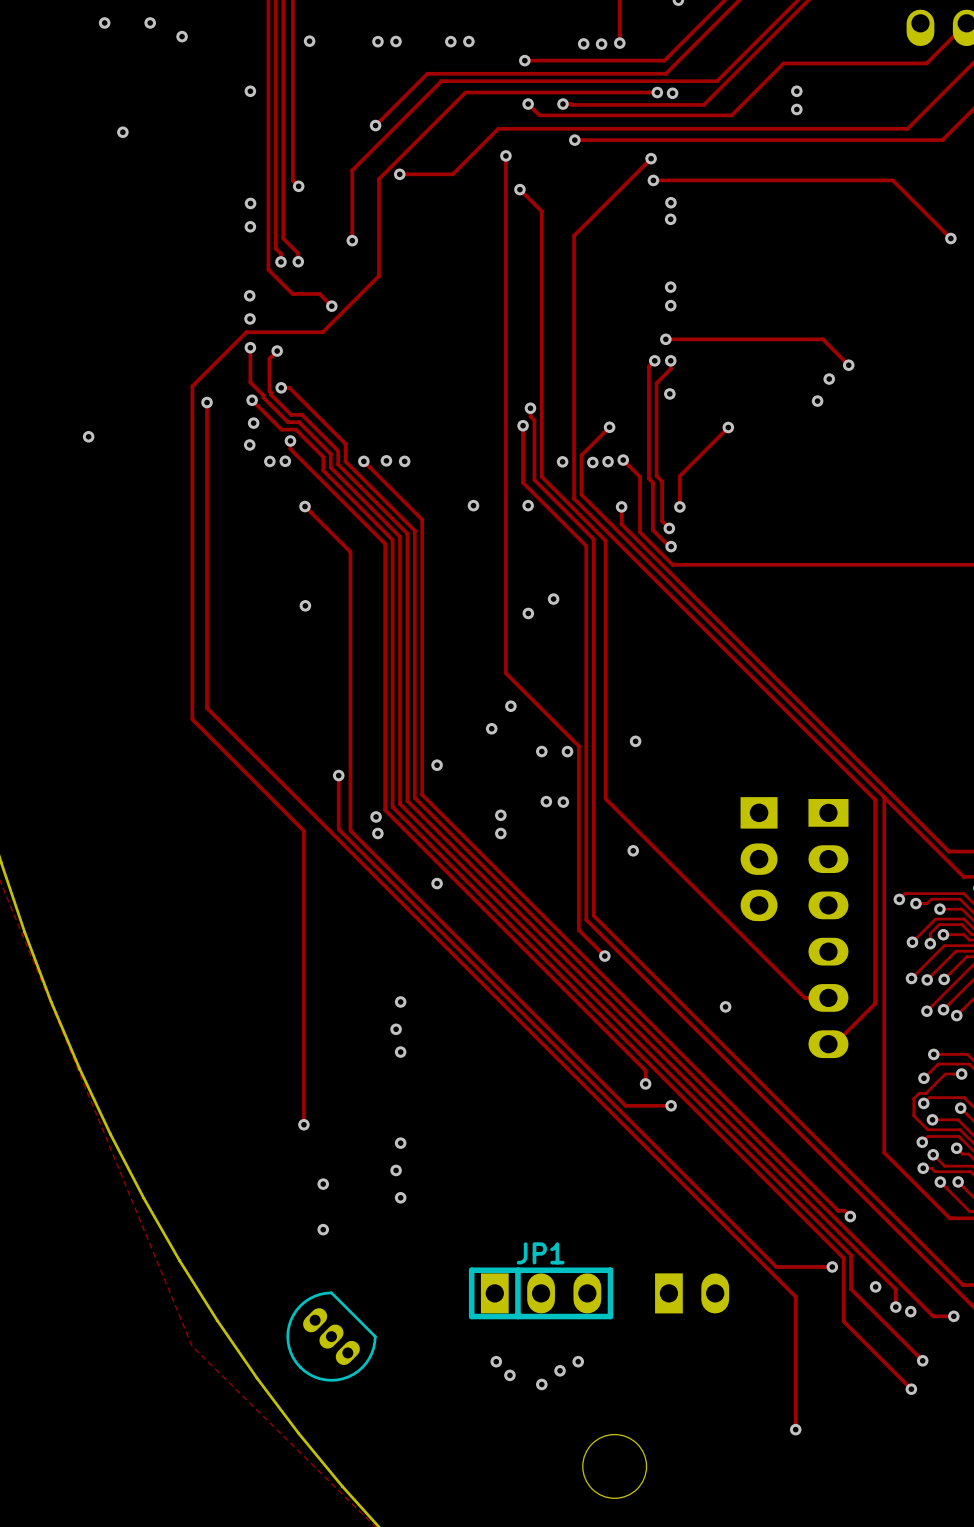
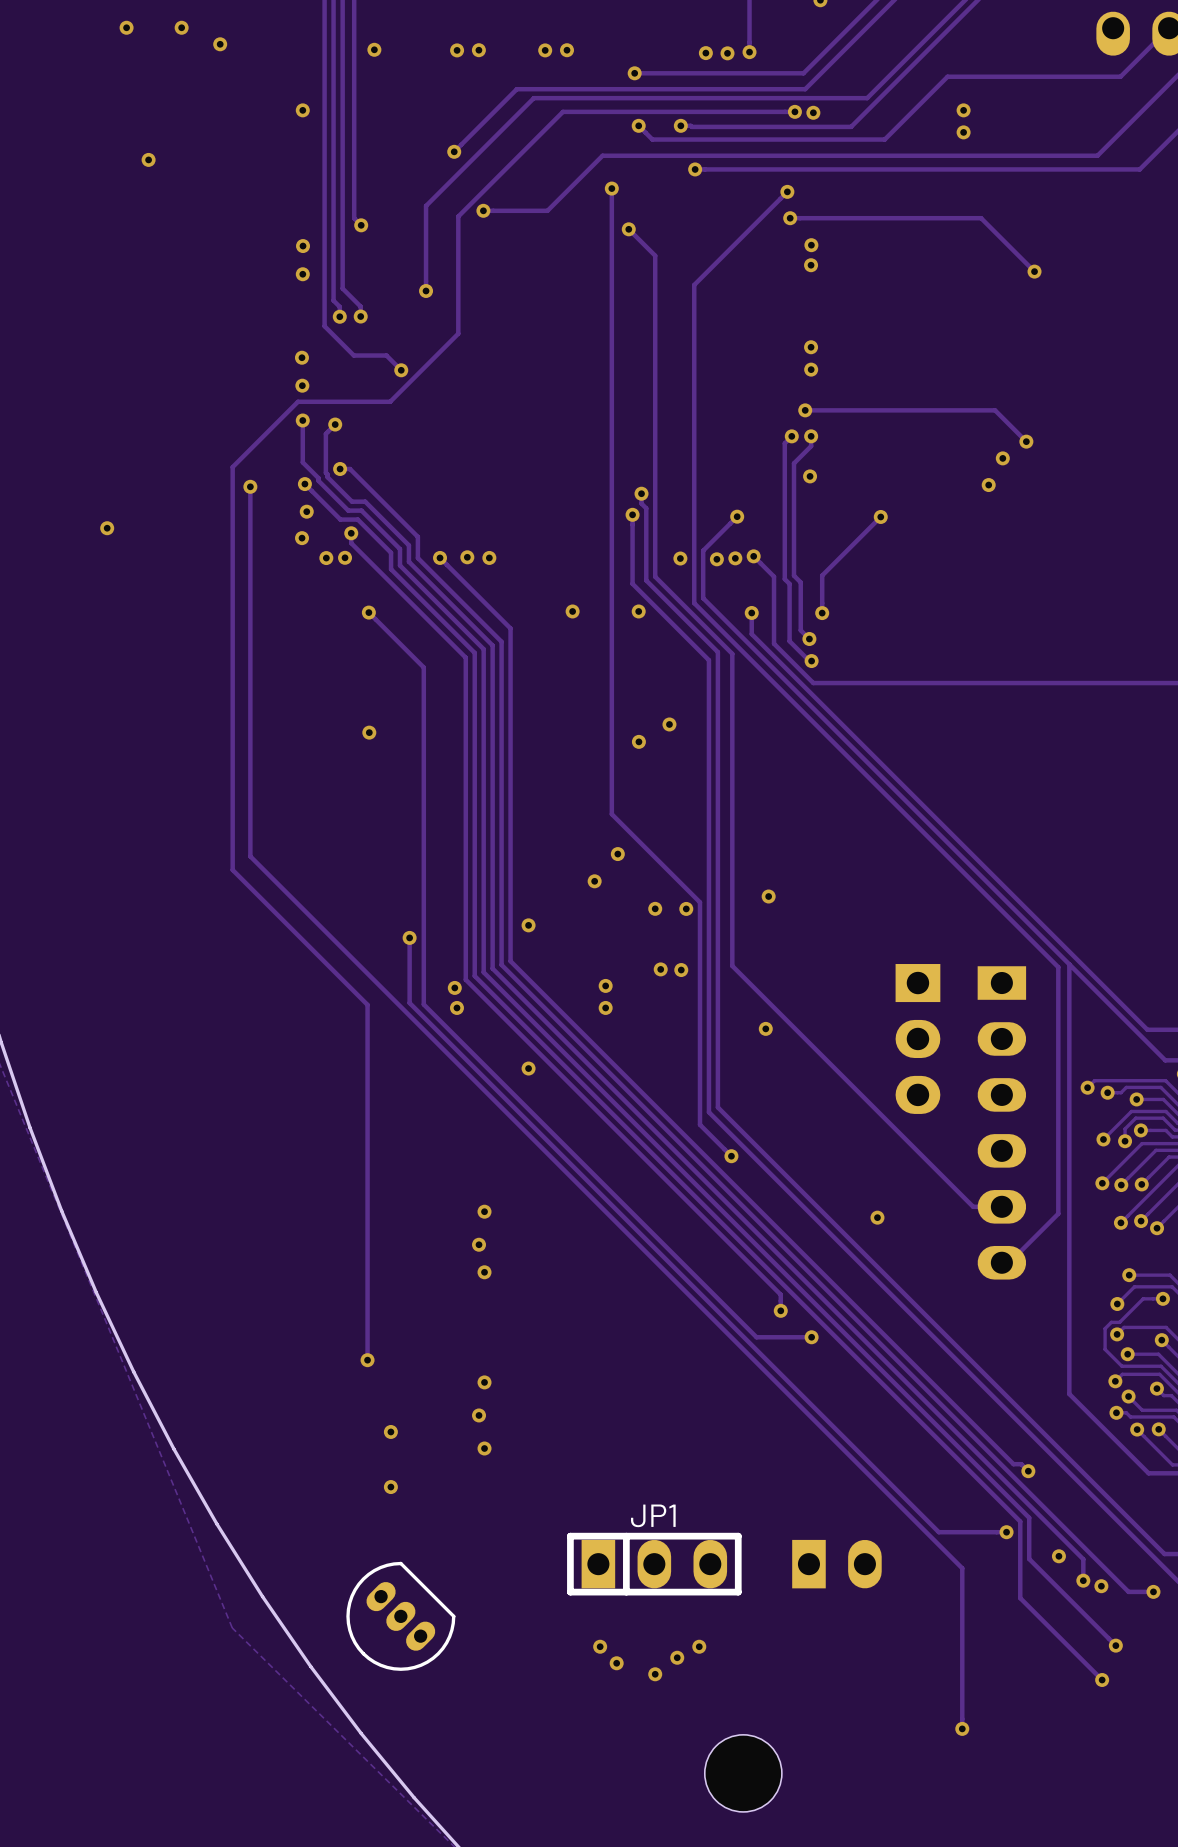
track: (811, 180) (892, 180) (950, 238) -> (981, 218) (1034, 271)
via position: (950, 238) -> (1034, 271)

